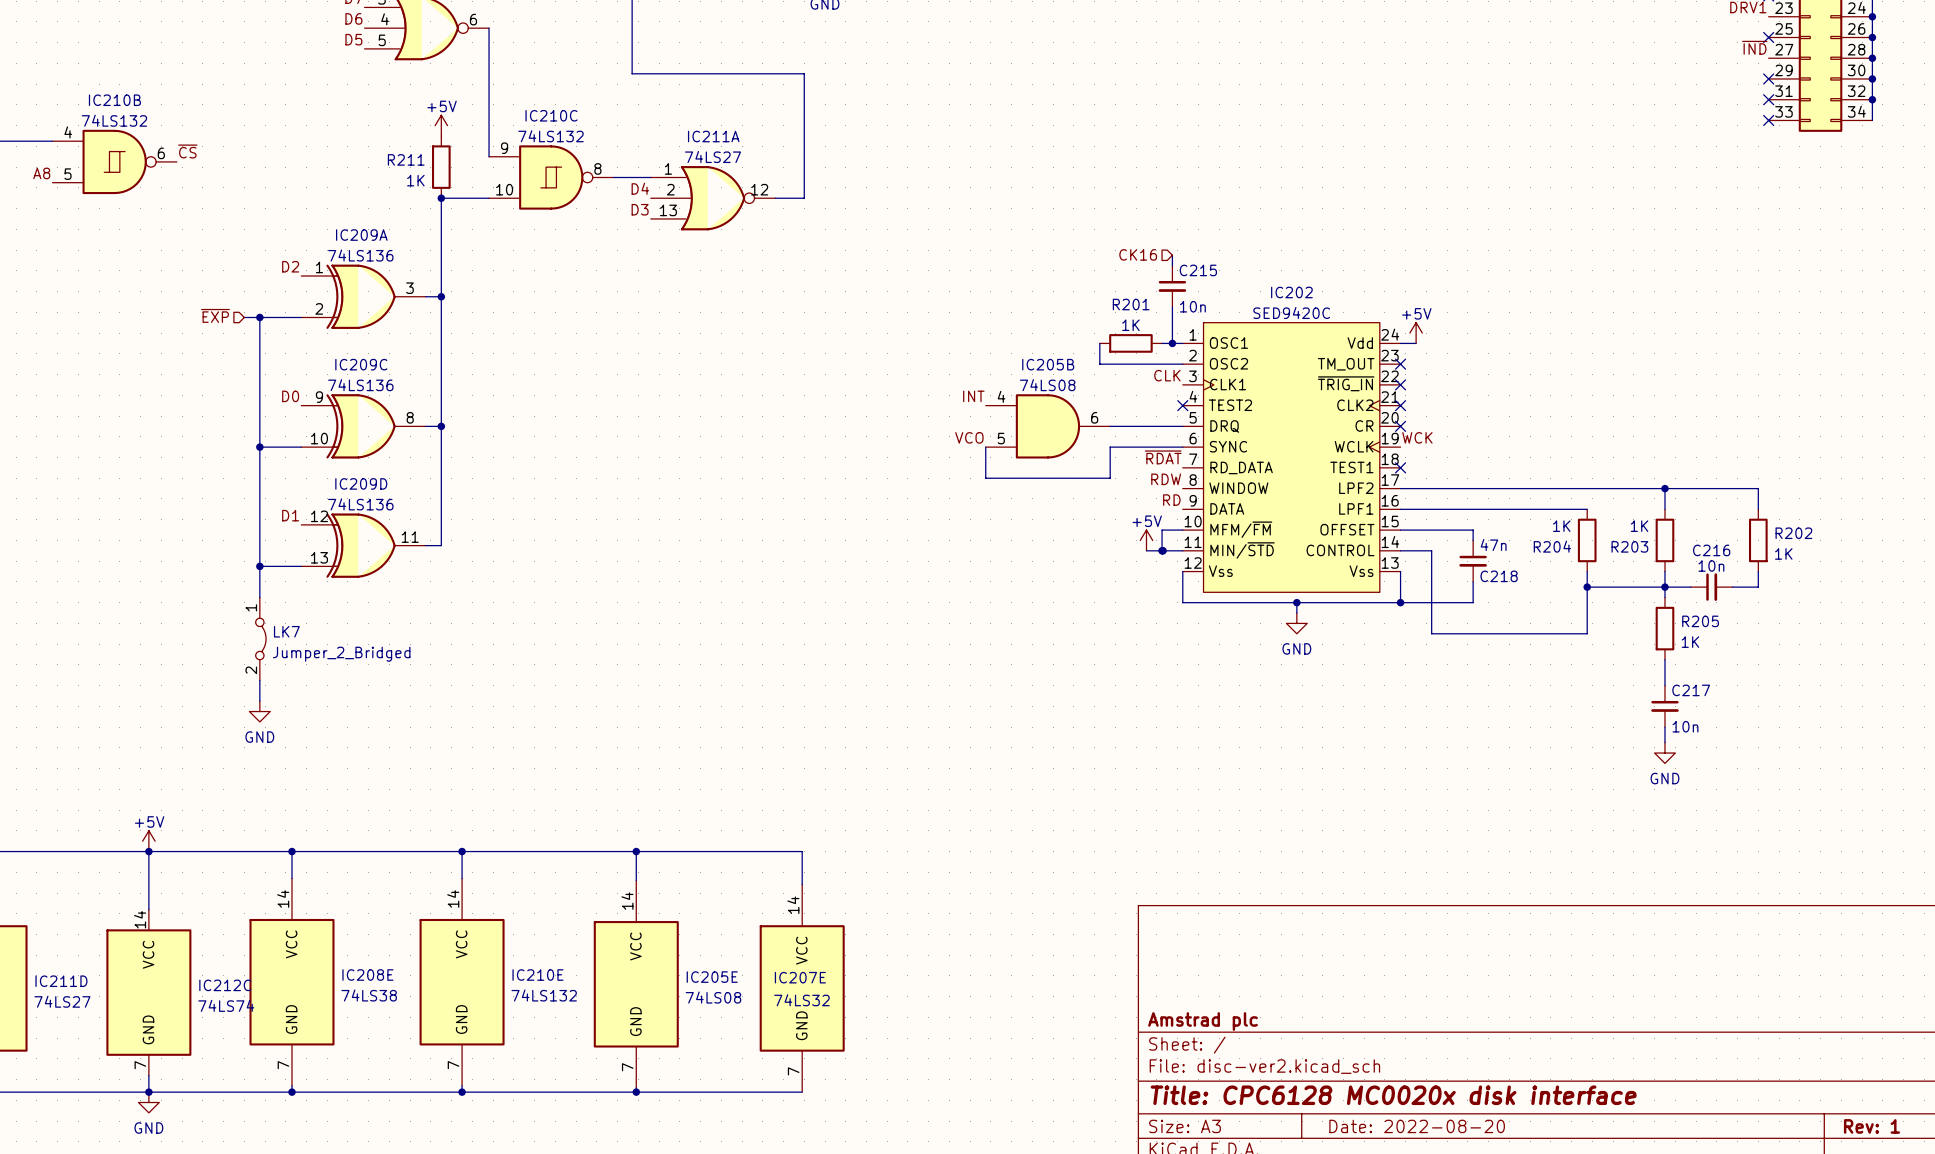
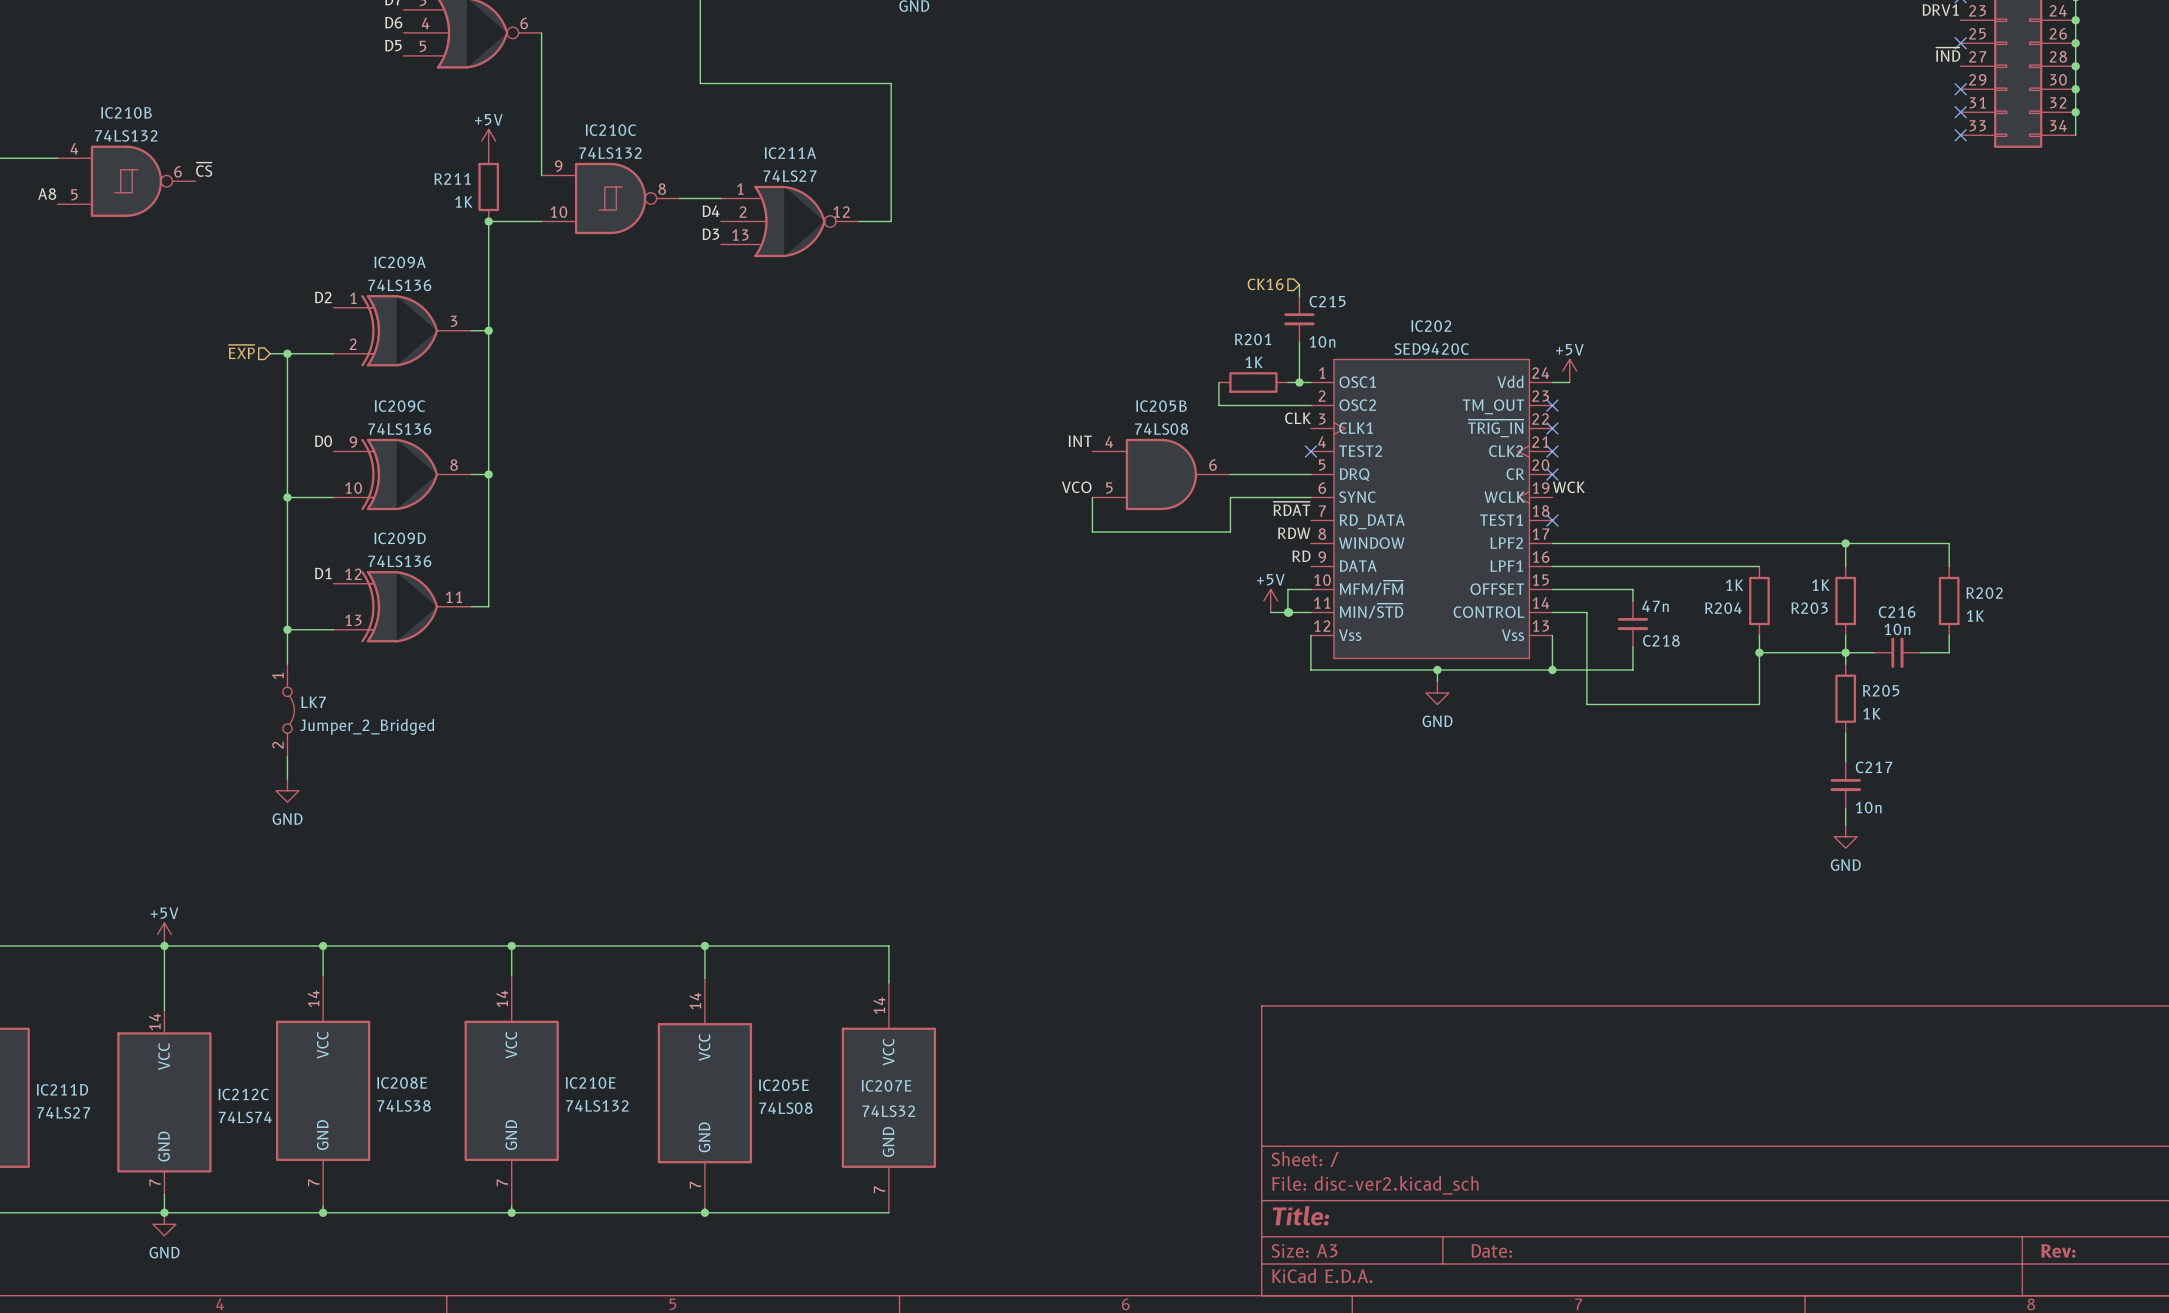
title block: Amstrad plc (1203, 1021) -> none
title block: Title: CPC6128 MC0020x disk interface (1393, 1095) -> Title: (1301, 1215)
title block: Date: 2022-08-20 (1417, 1126) -> Date: (1491, 1250)
title block: Rev: 1 (1871, 1126) -> Rev: (2058, 1250)

